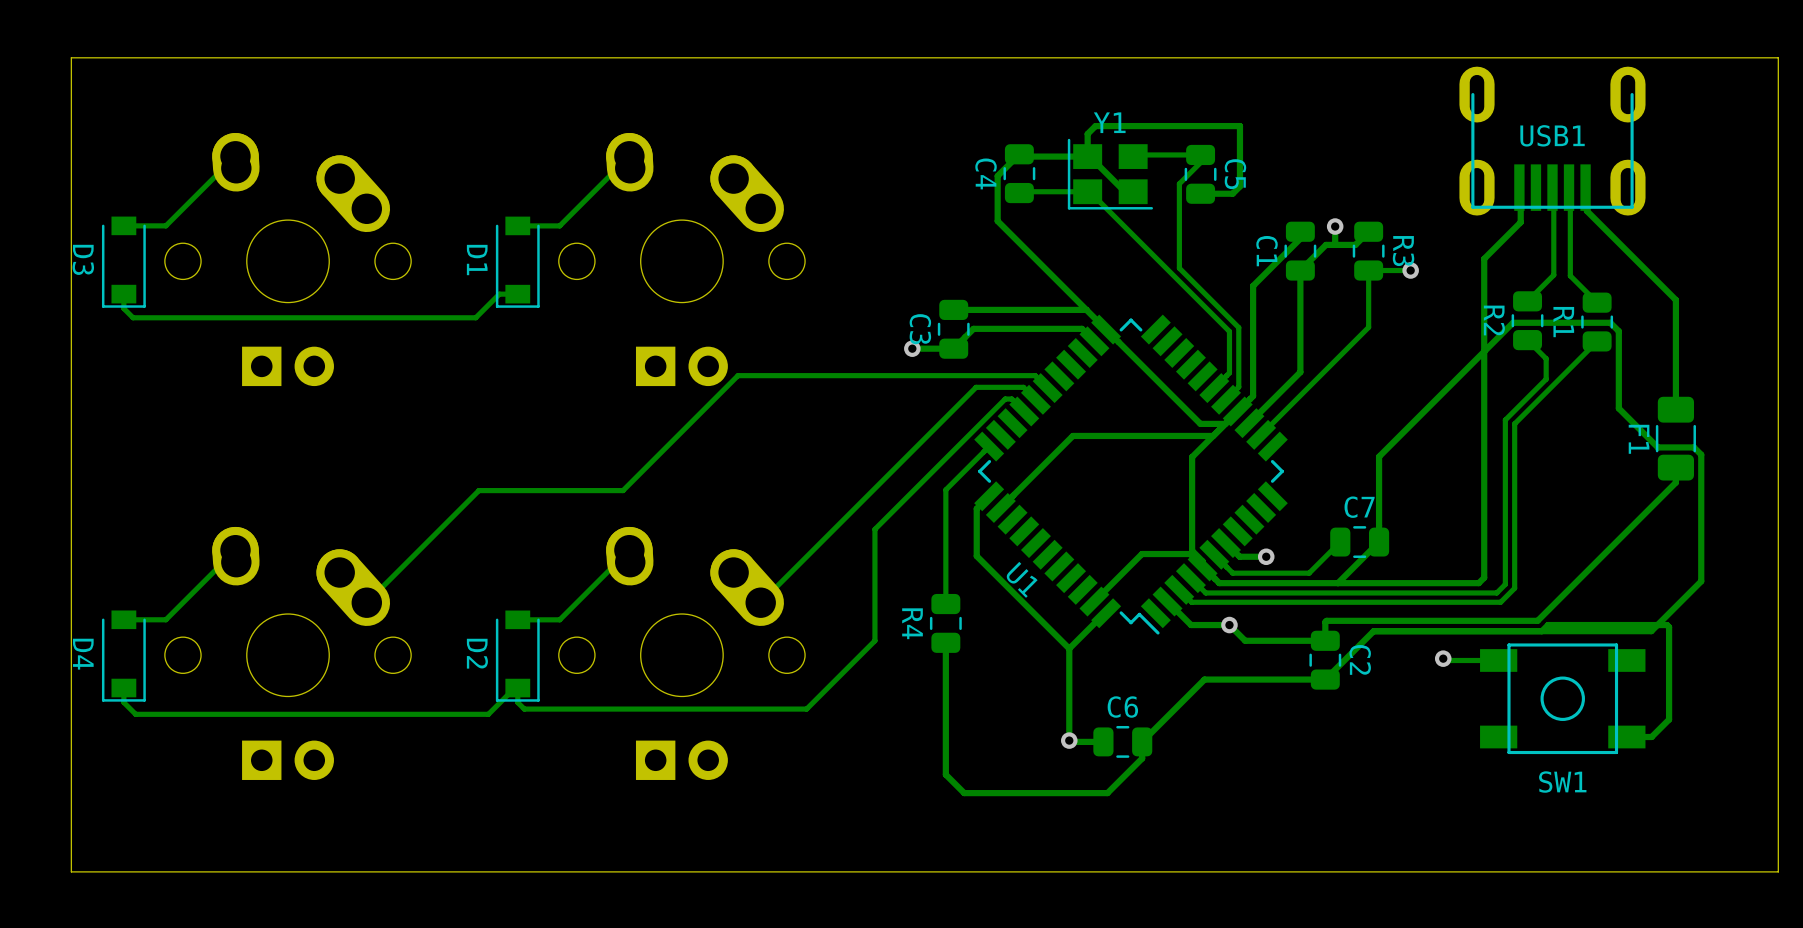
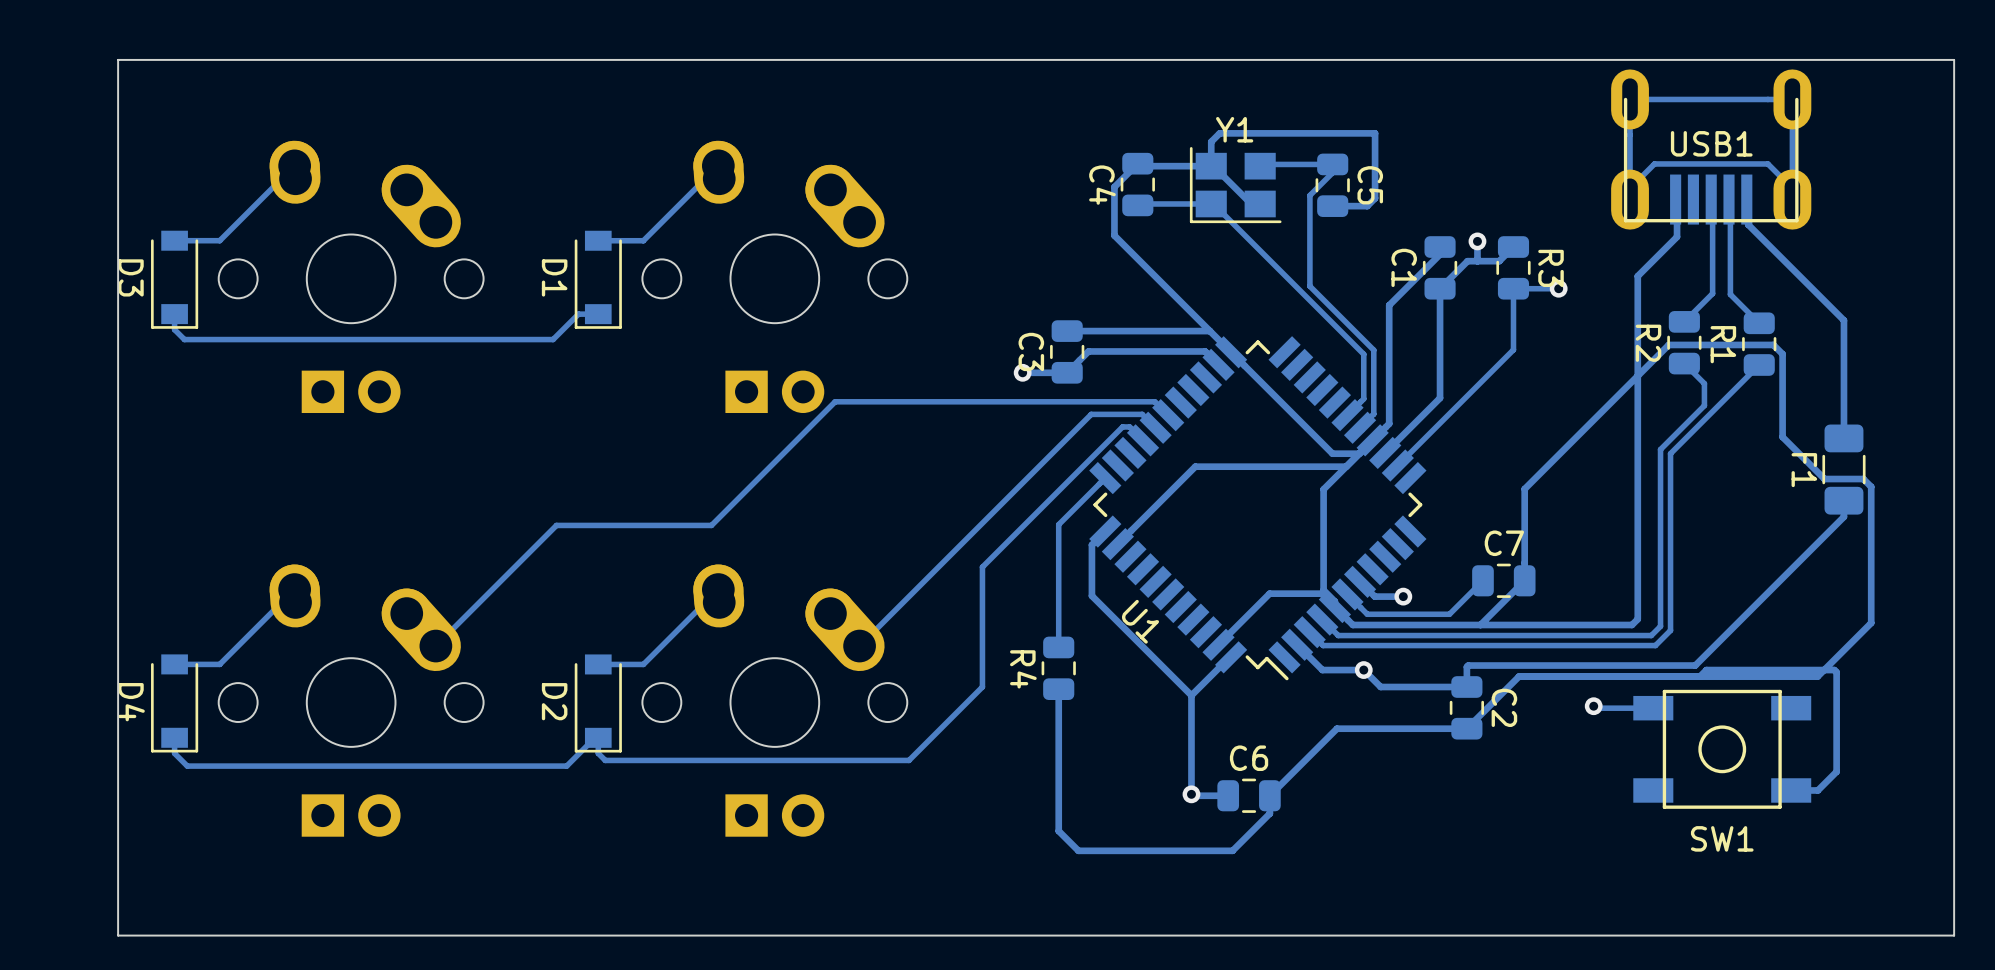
track: none -> (1792, 99) (1630, 99) (1630, 188) (1654, 163) (1767, 163) (1792, 188) (1792, 99)

